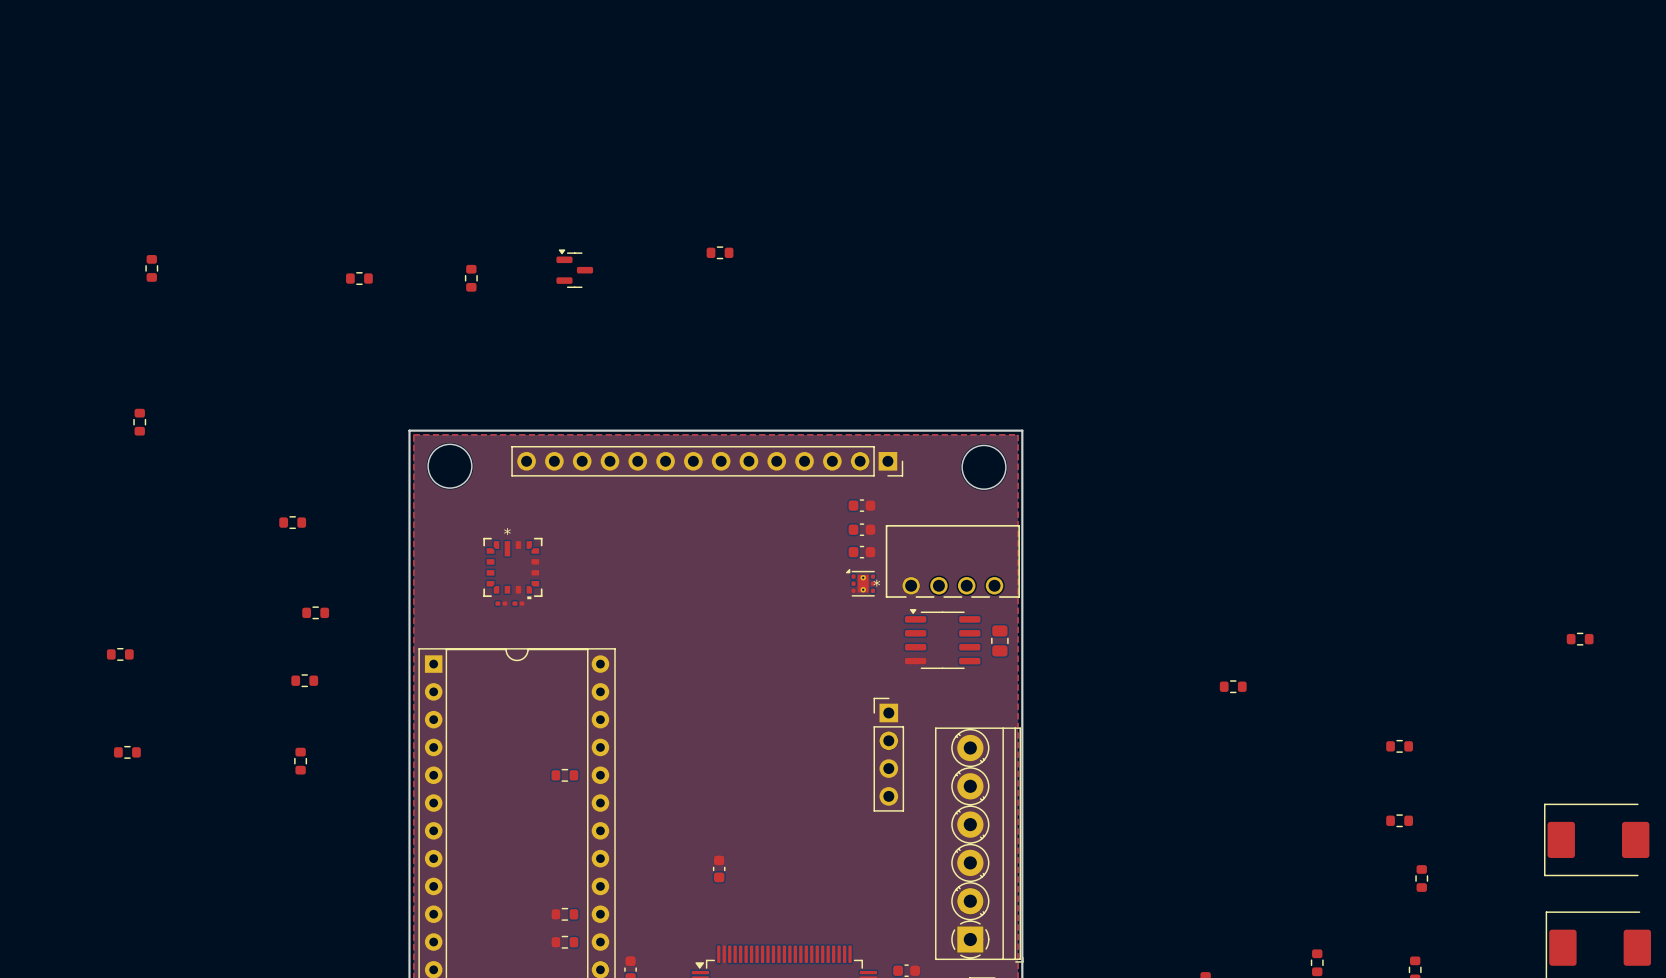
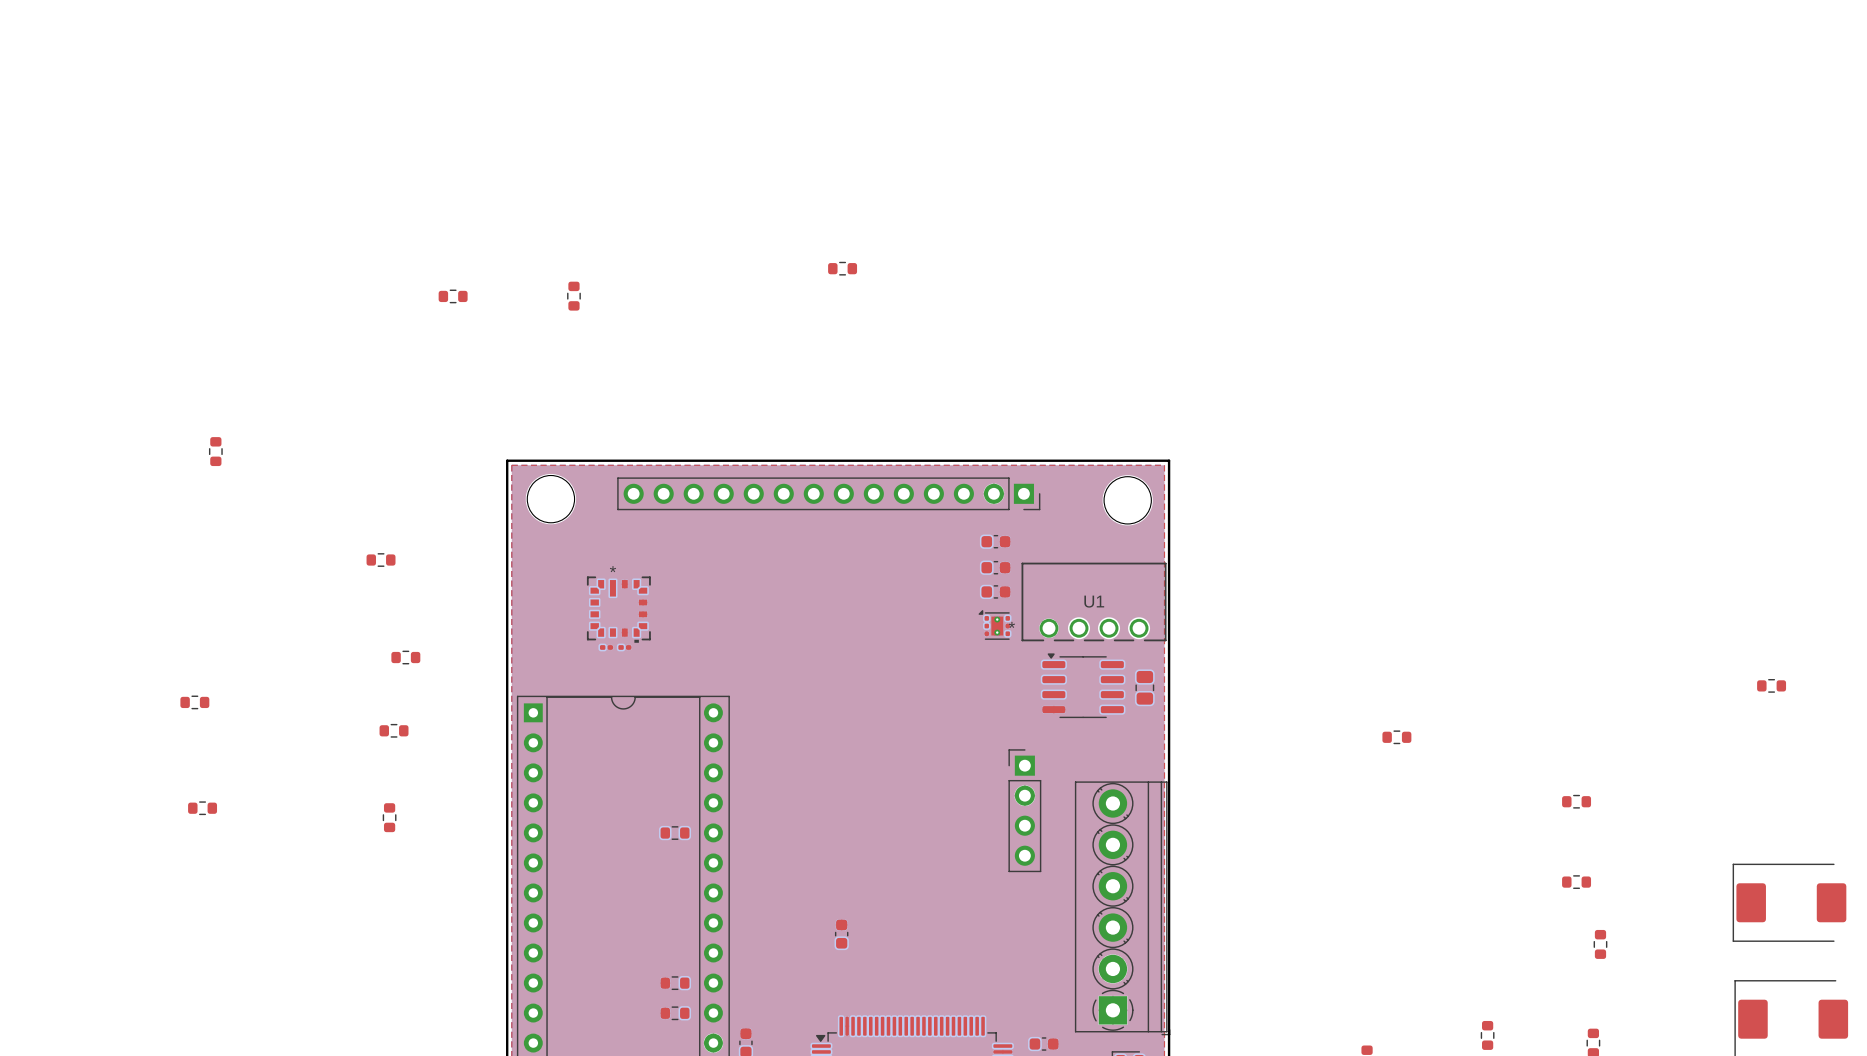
part: (151, 268) -> none
part: (574, 268) -> none
U1 name: none -> U1 (1094, 601)

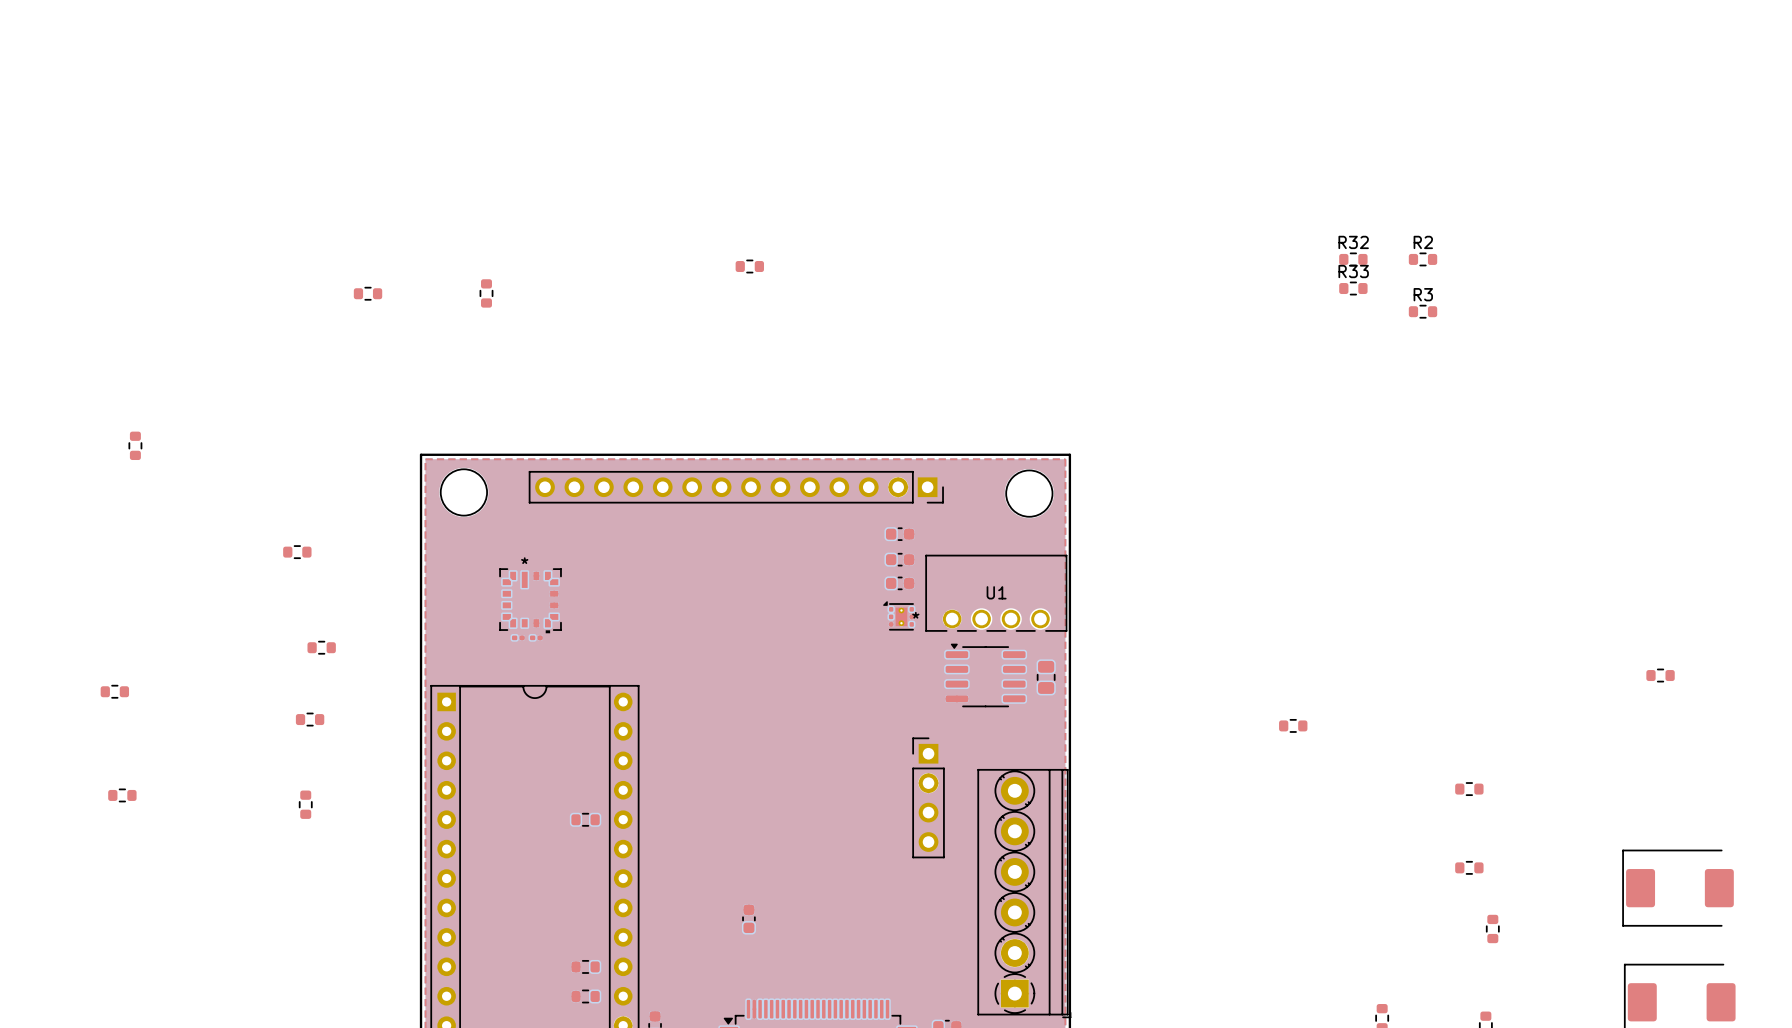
R32: none -> (1353, 259)
R2: none -> (1423, 259)
R33: none -> (1353, 288)
R3: none -> (1423, 311)

